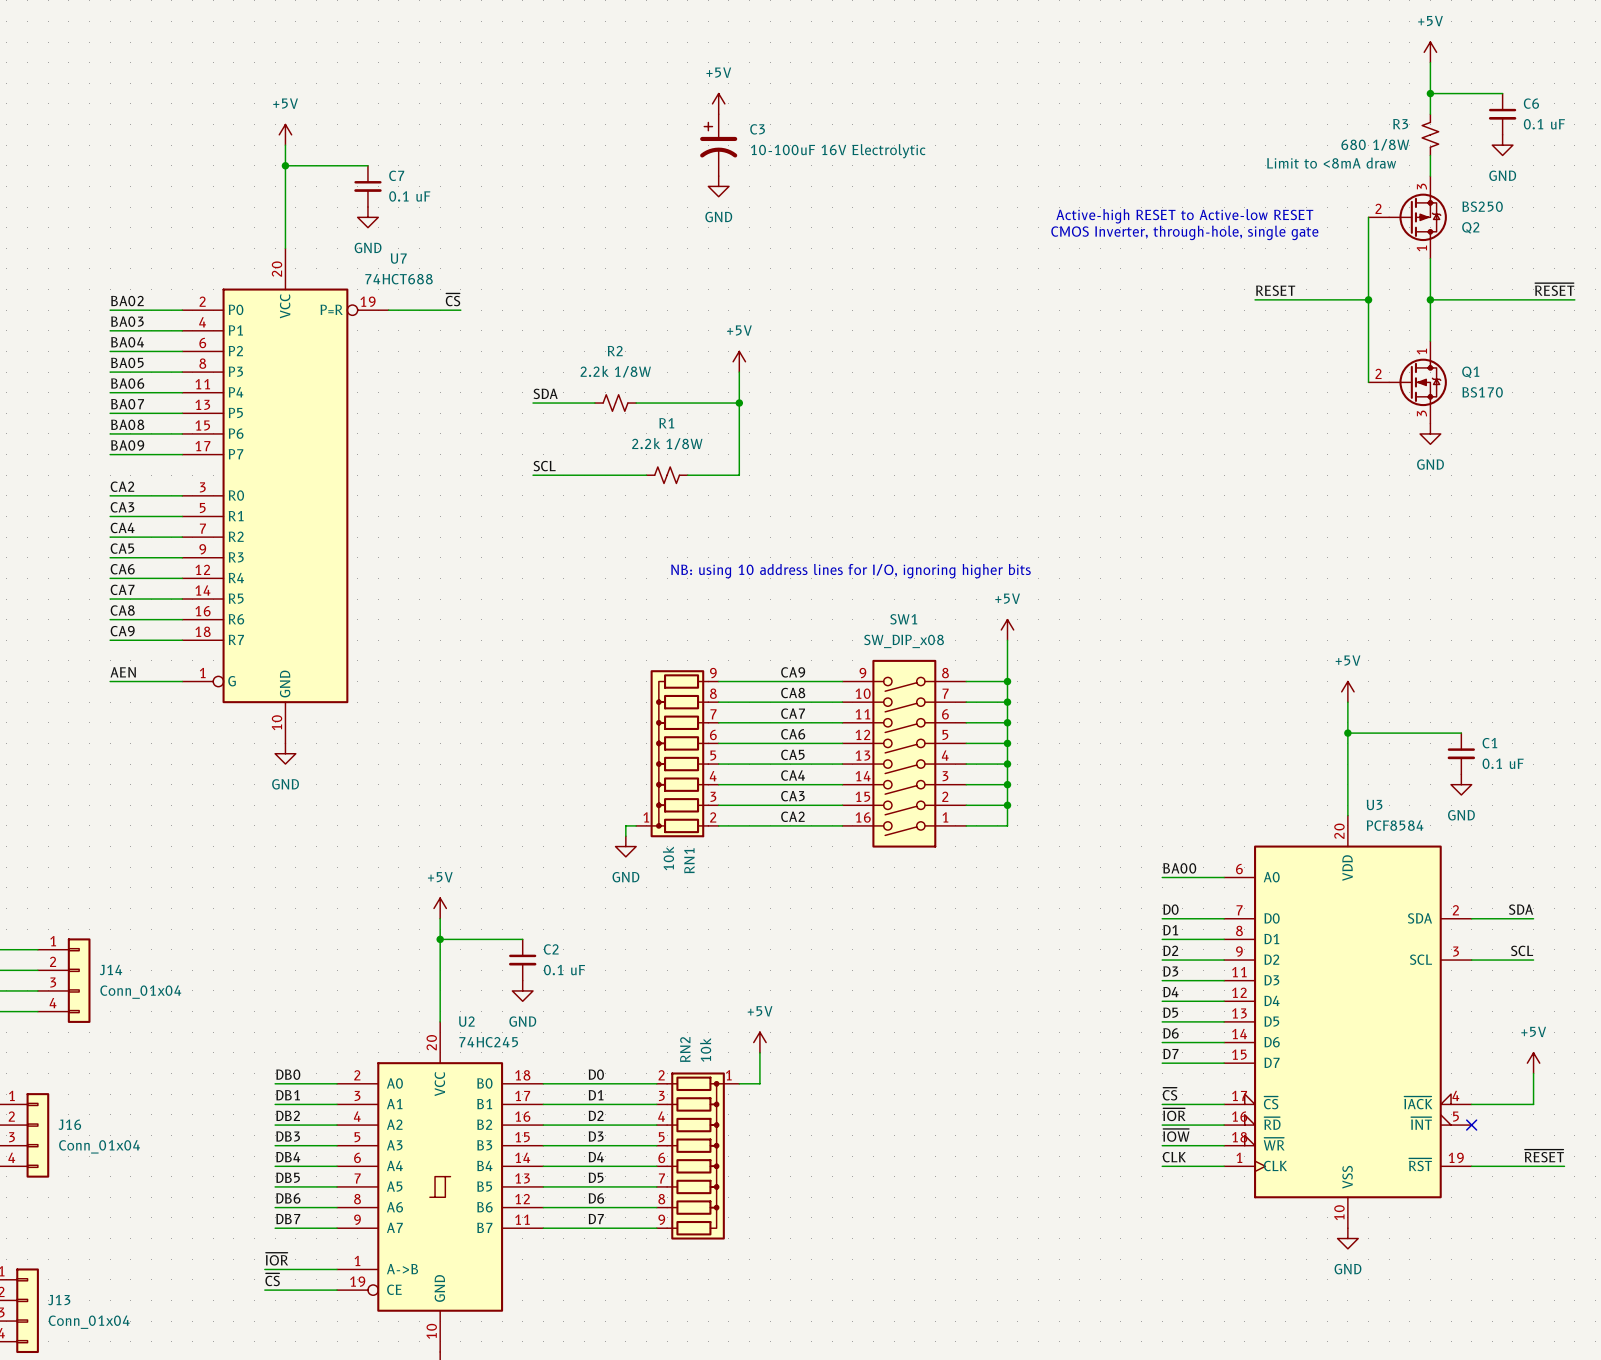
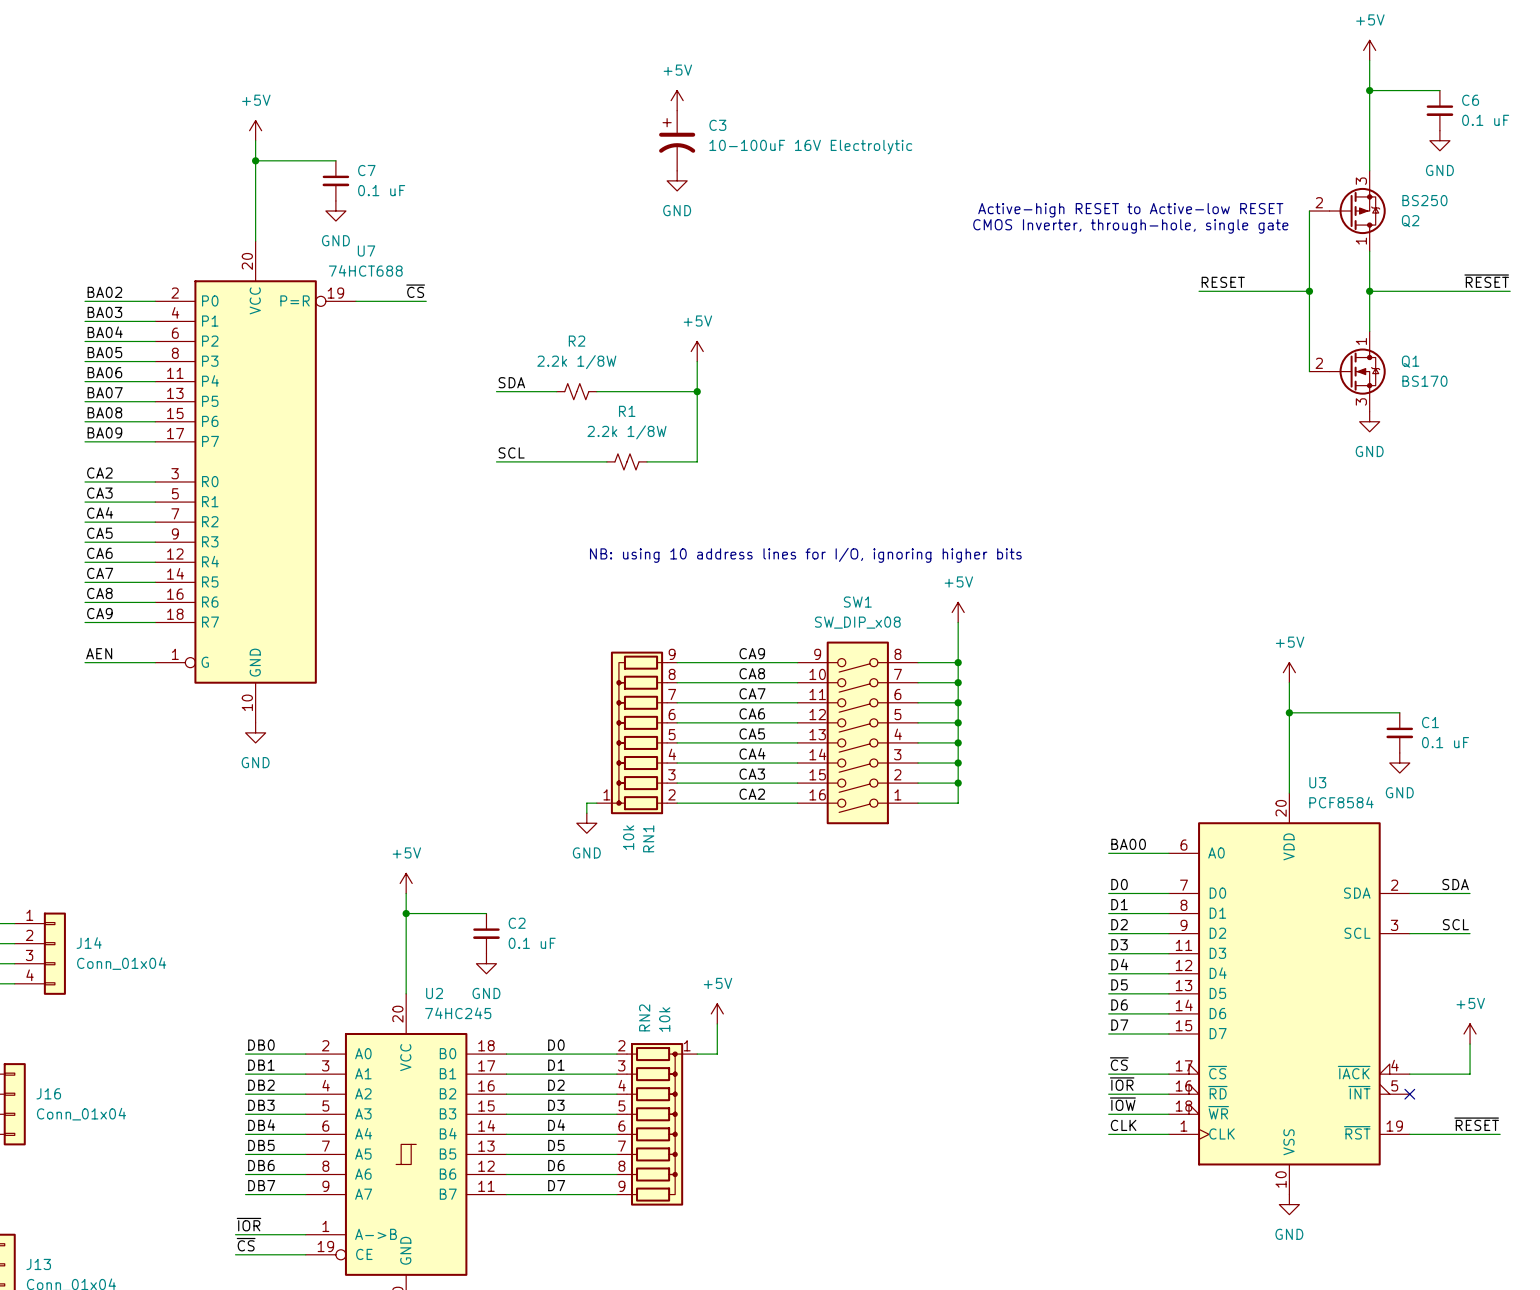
R3: 680 1/8W (1430, 134) -> none

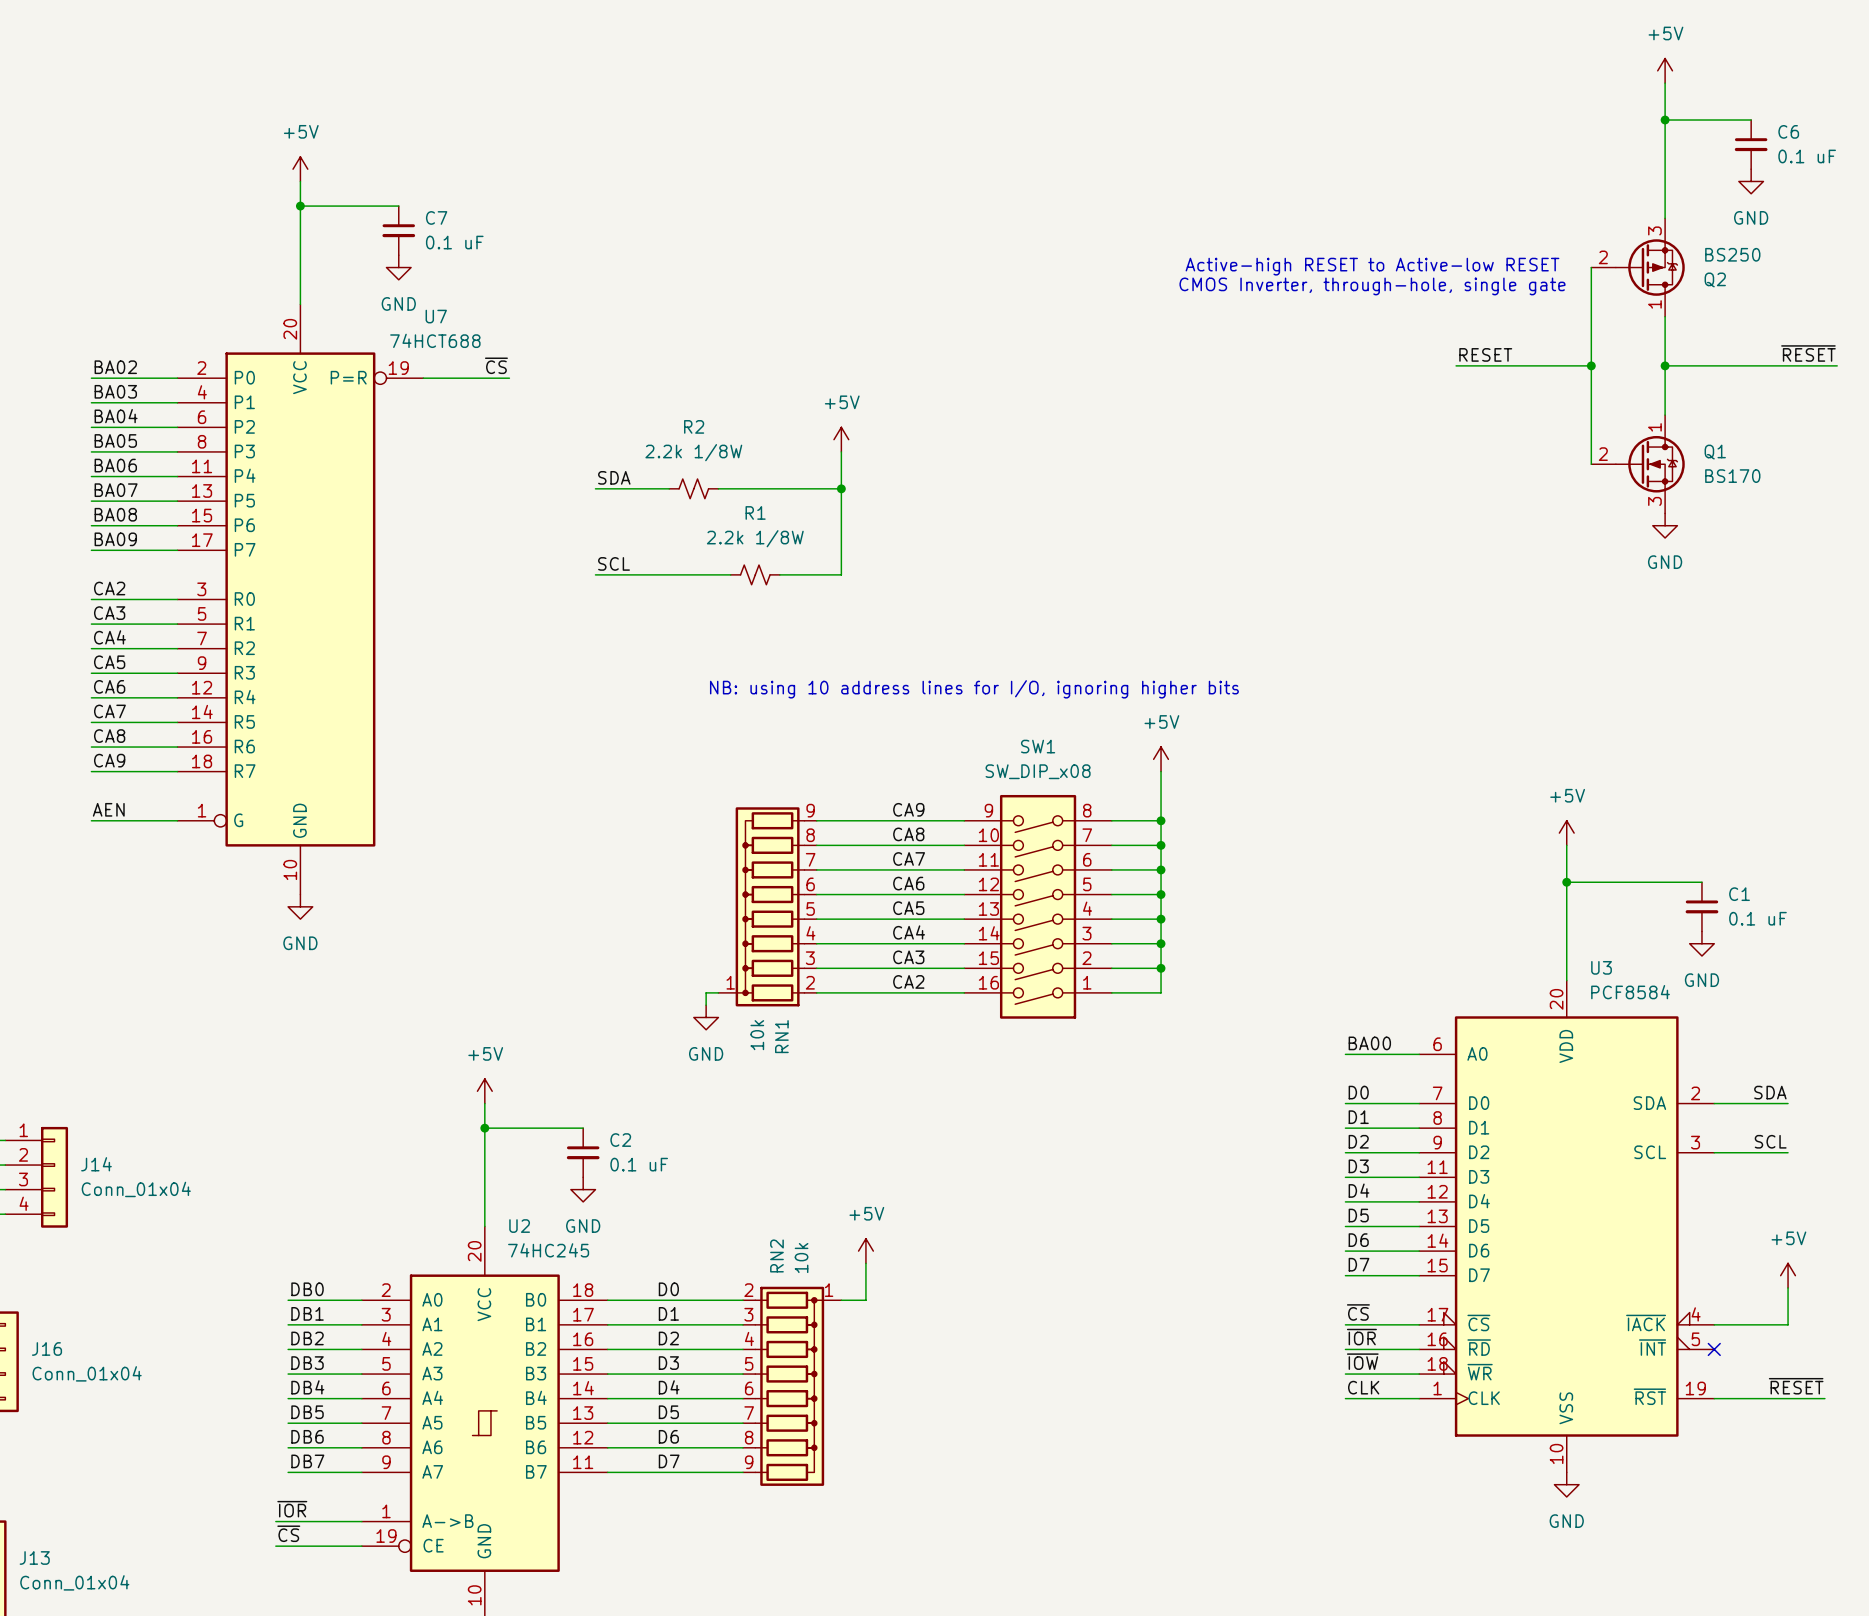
power symbol: +5V (677, 100) -> none
C3: 10-100uF 16V Electrolytic (677, 140) -> none
power symbol: GND (677, 180) -> none

